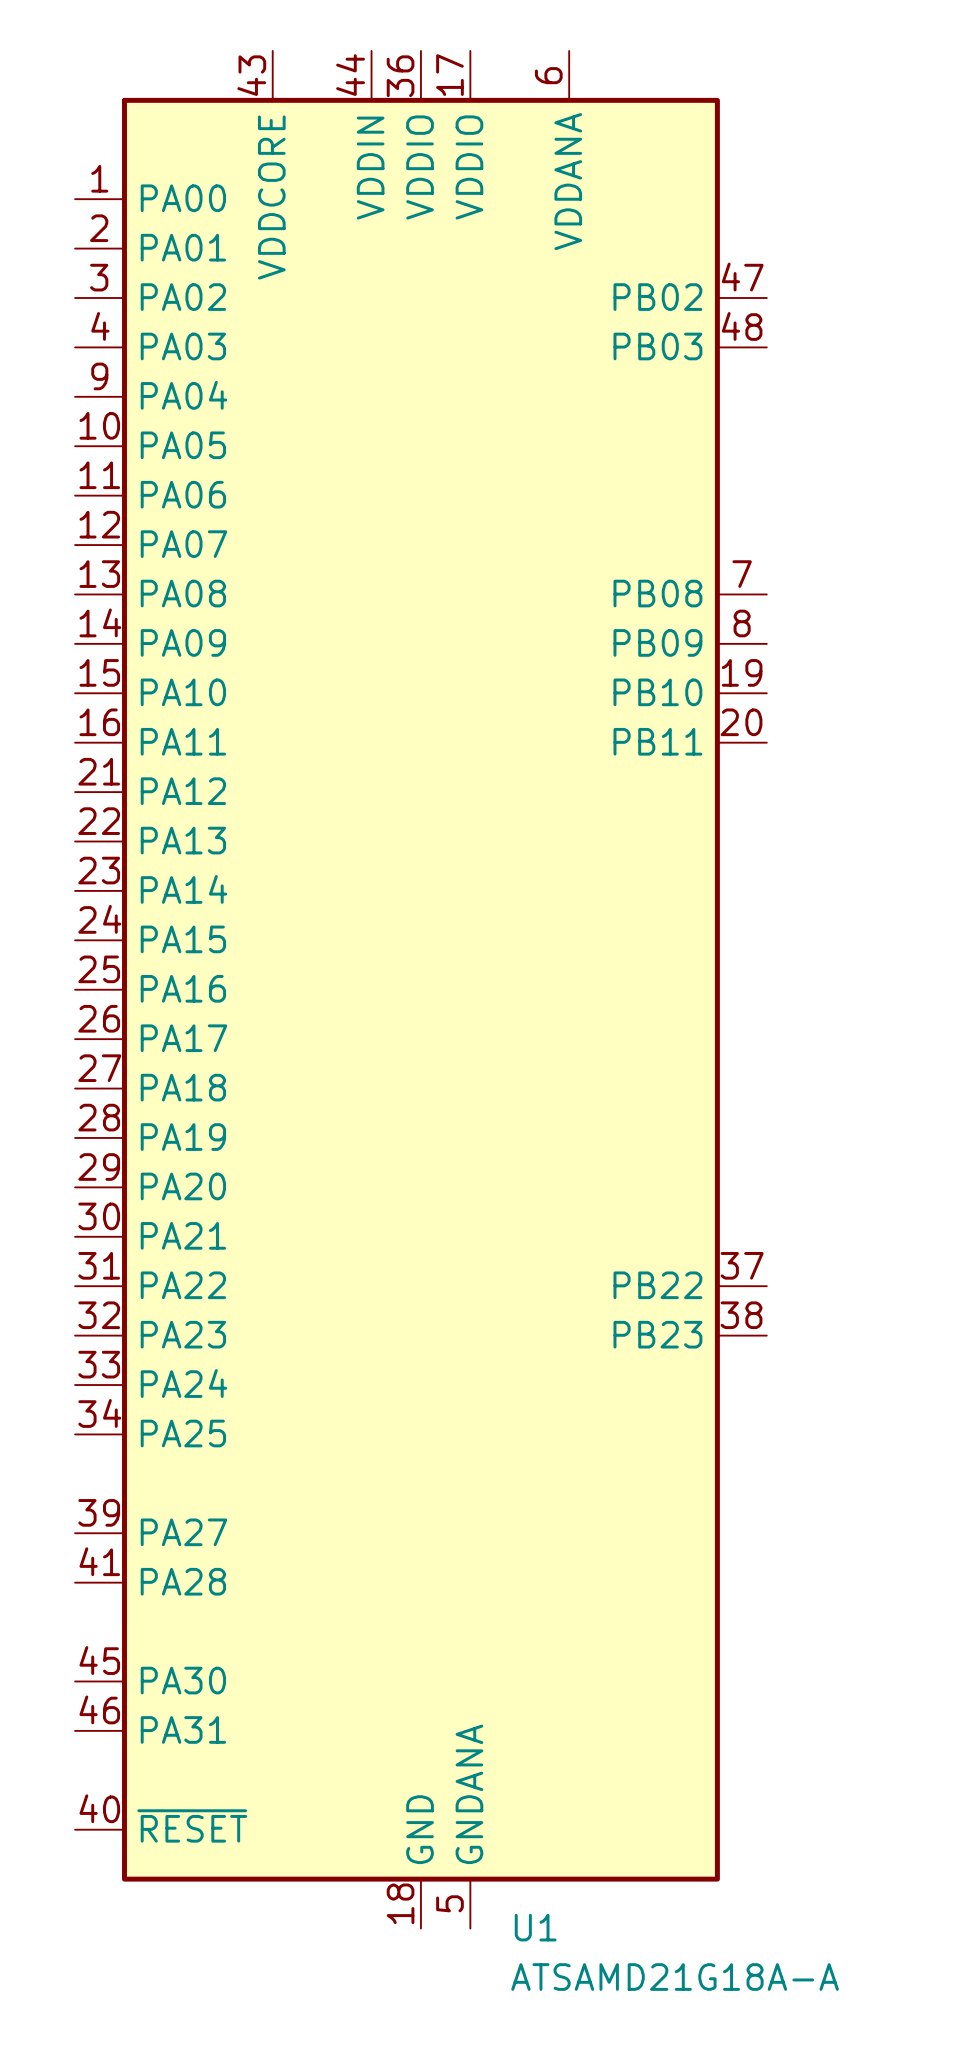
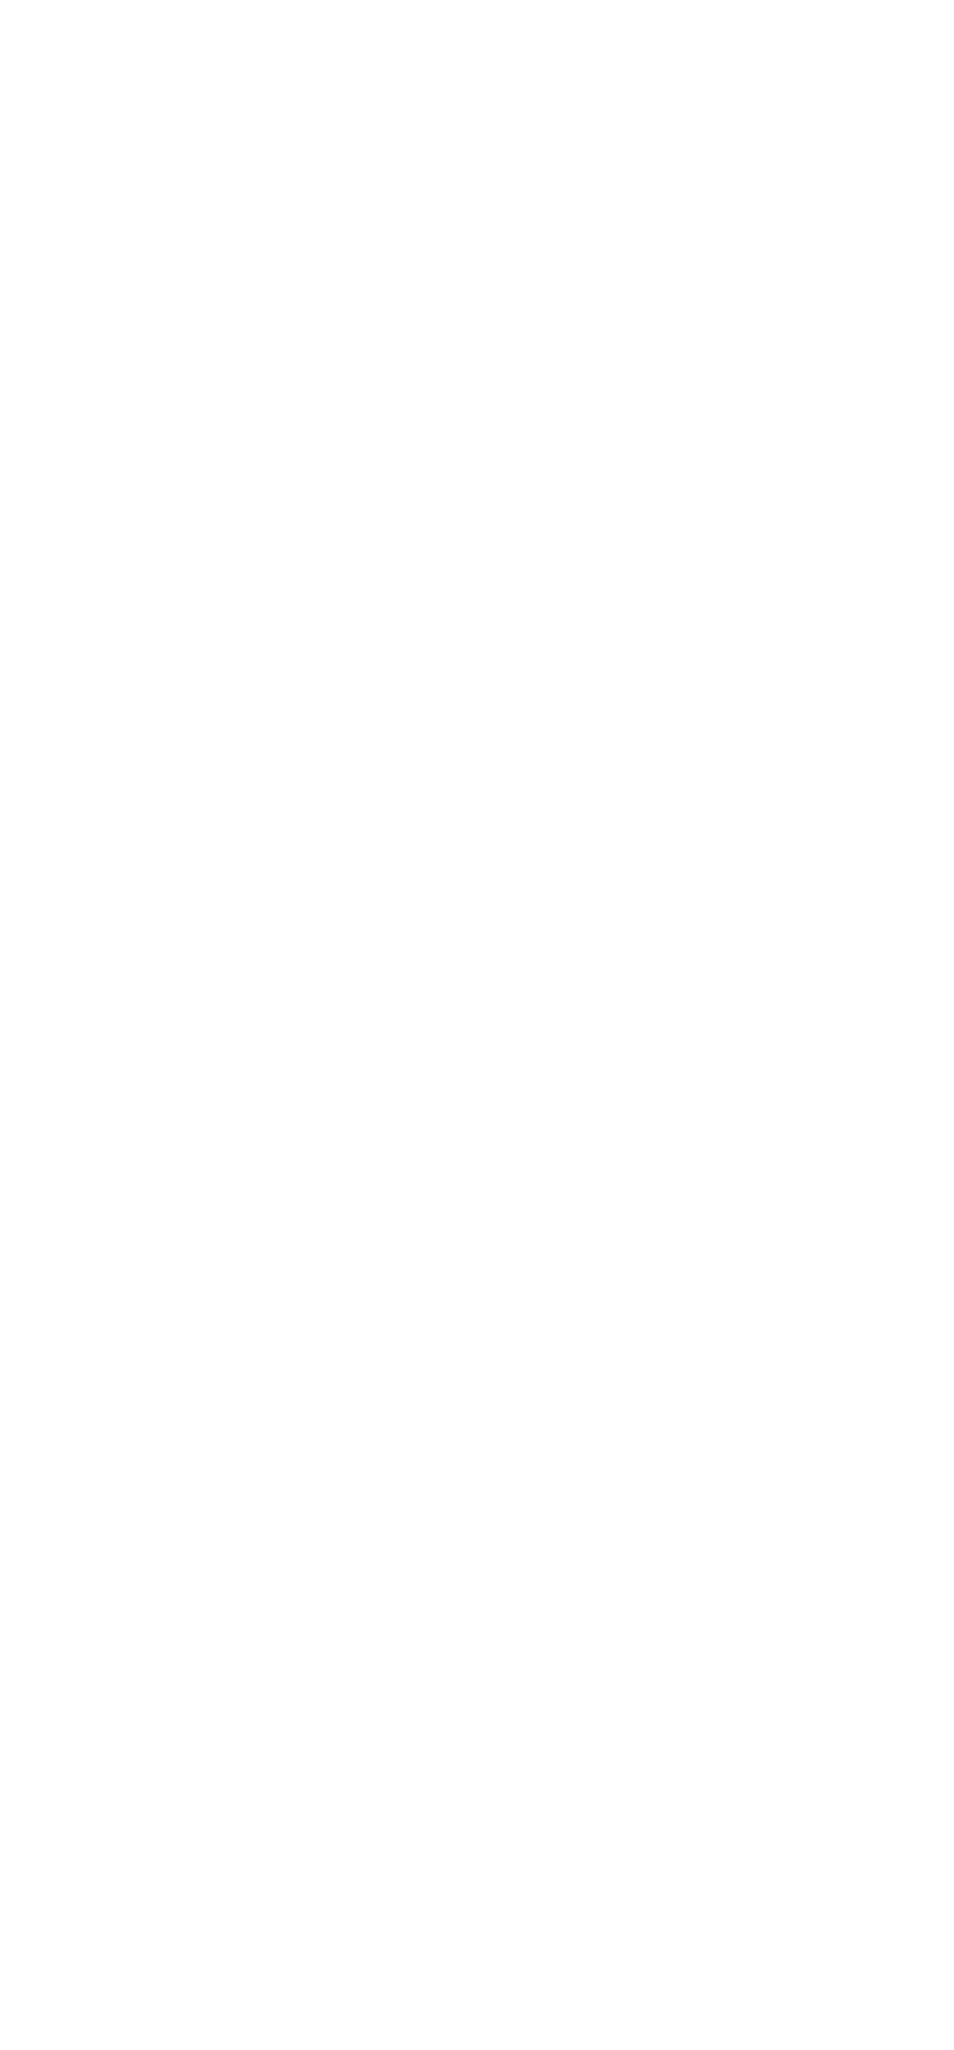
U1: ATSAMD21G18A-A (420, 989) -> none

